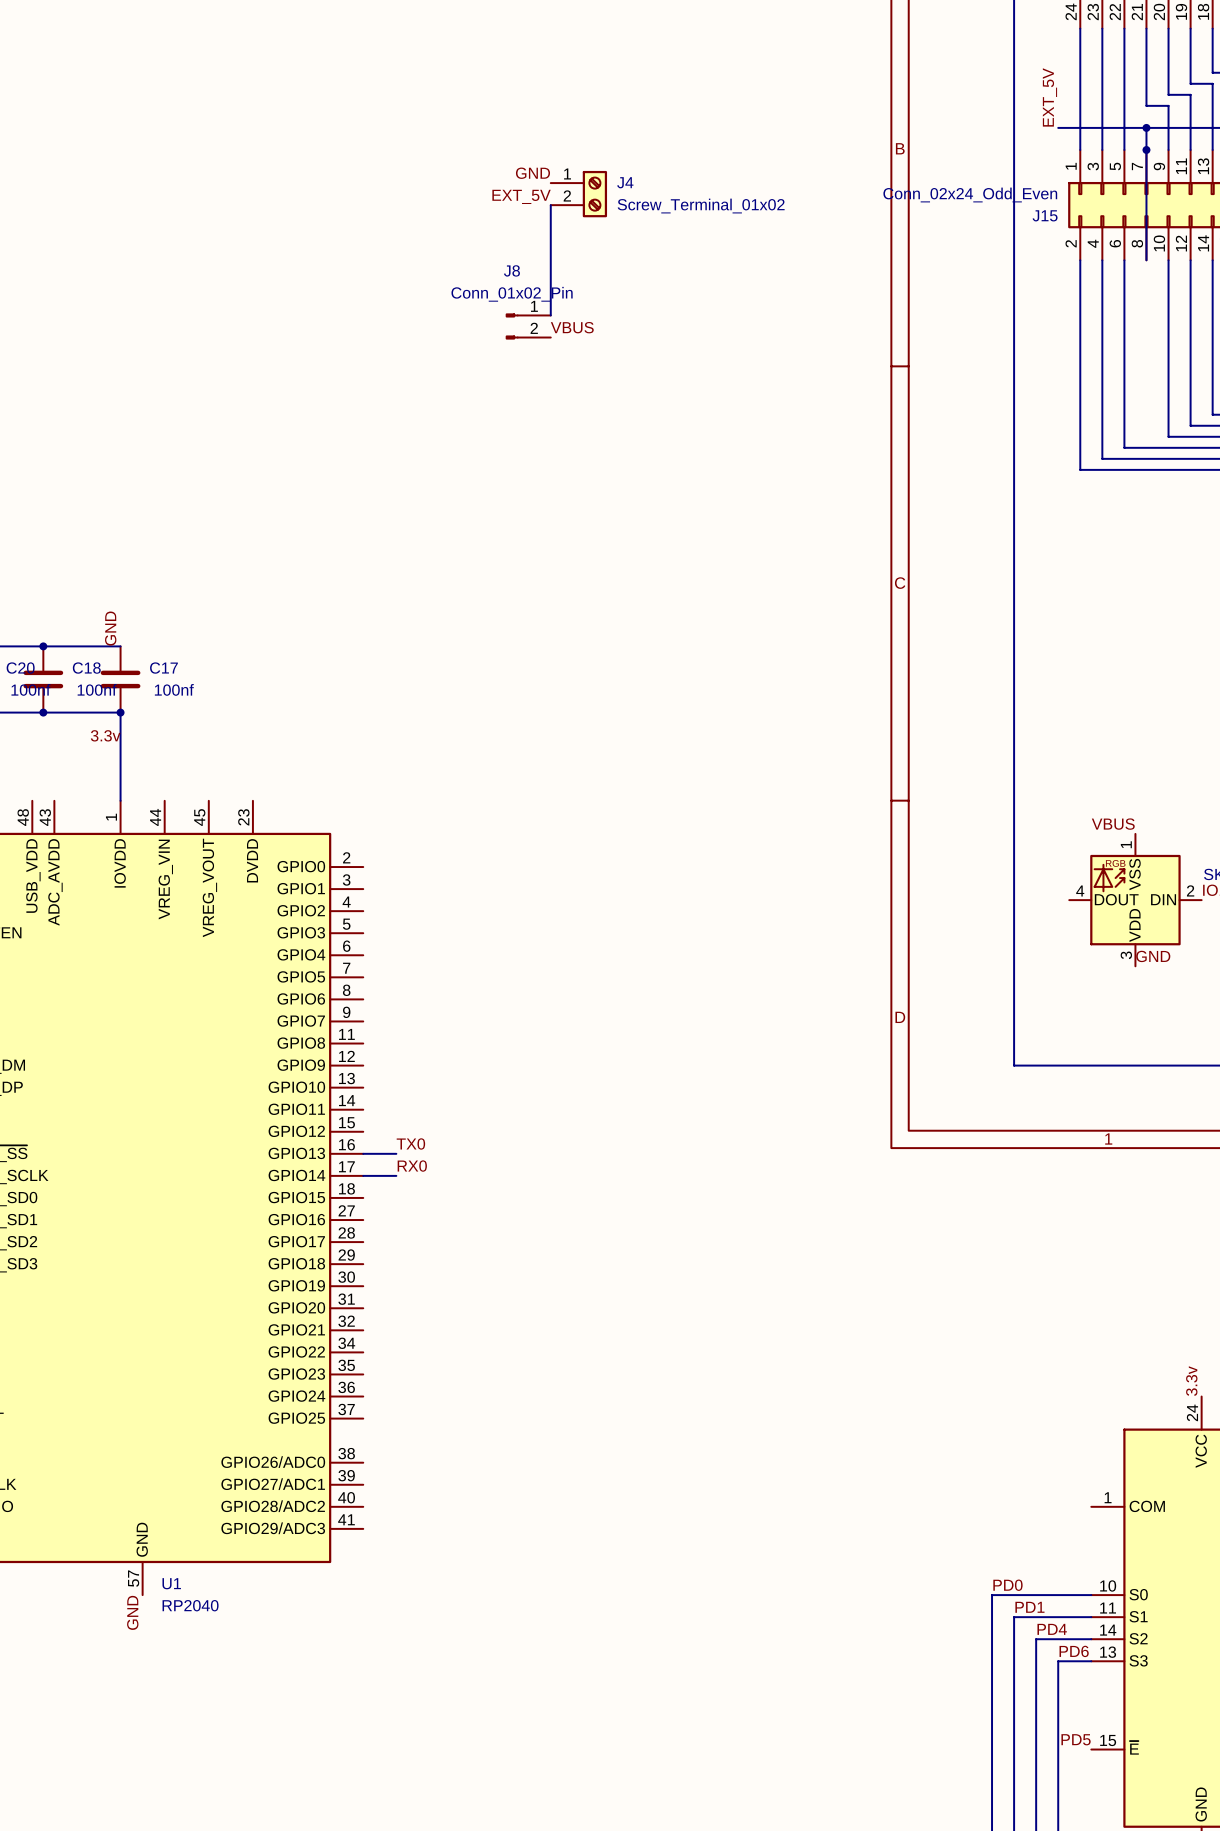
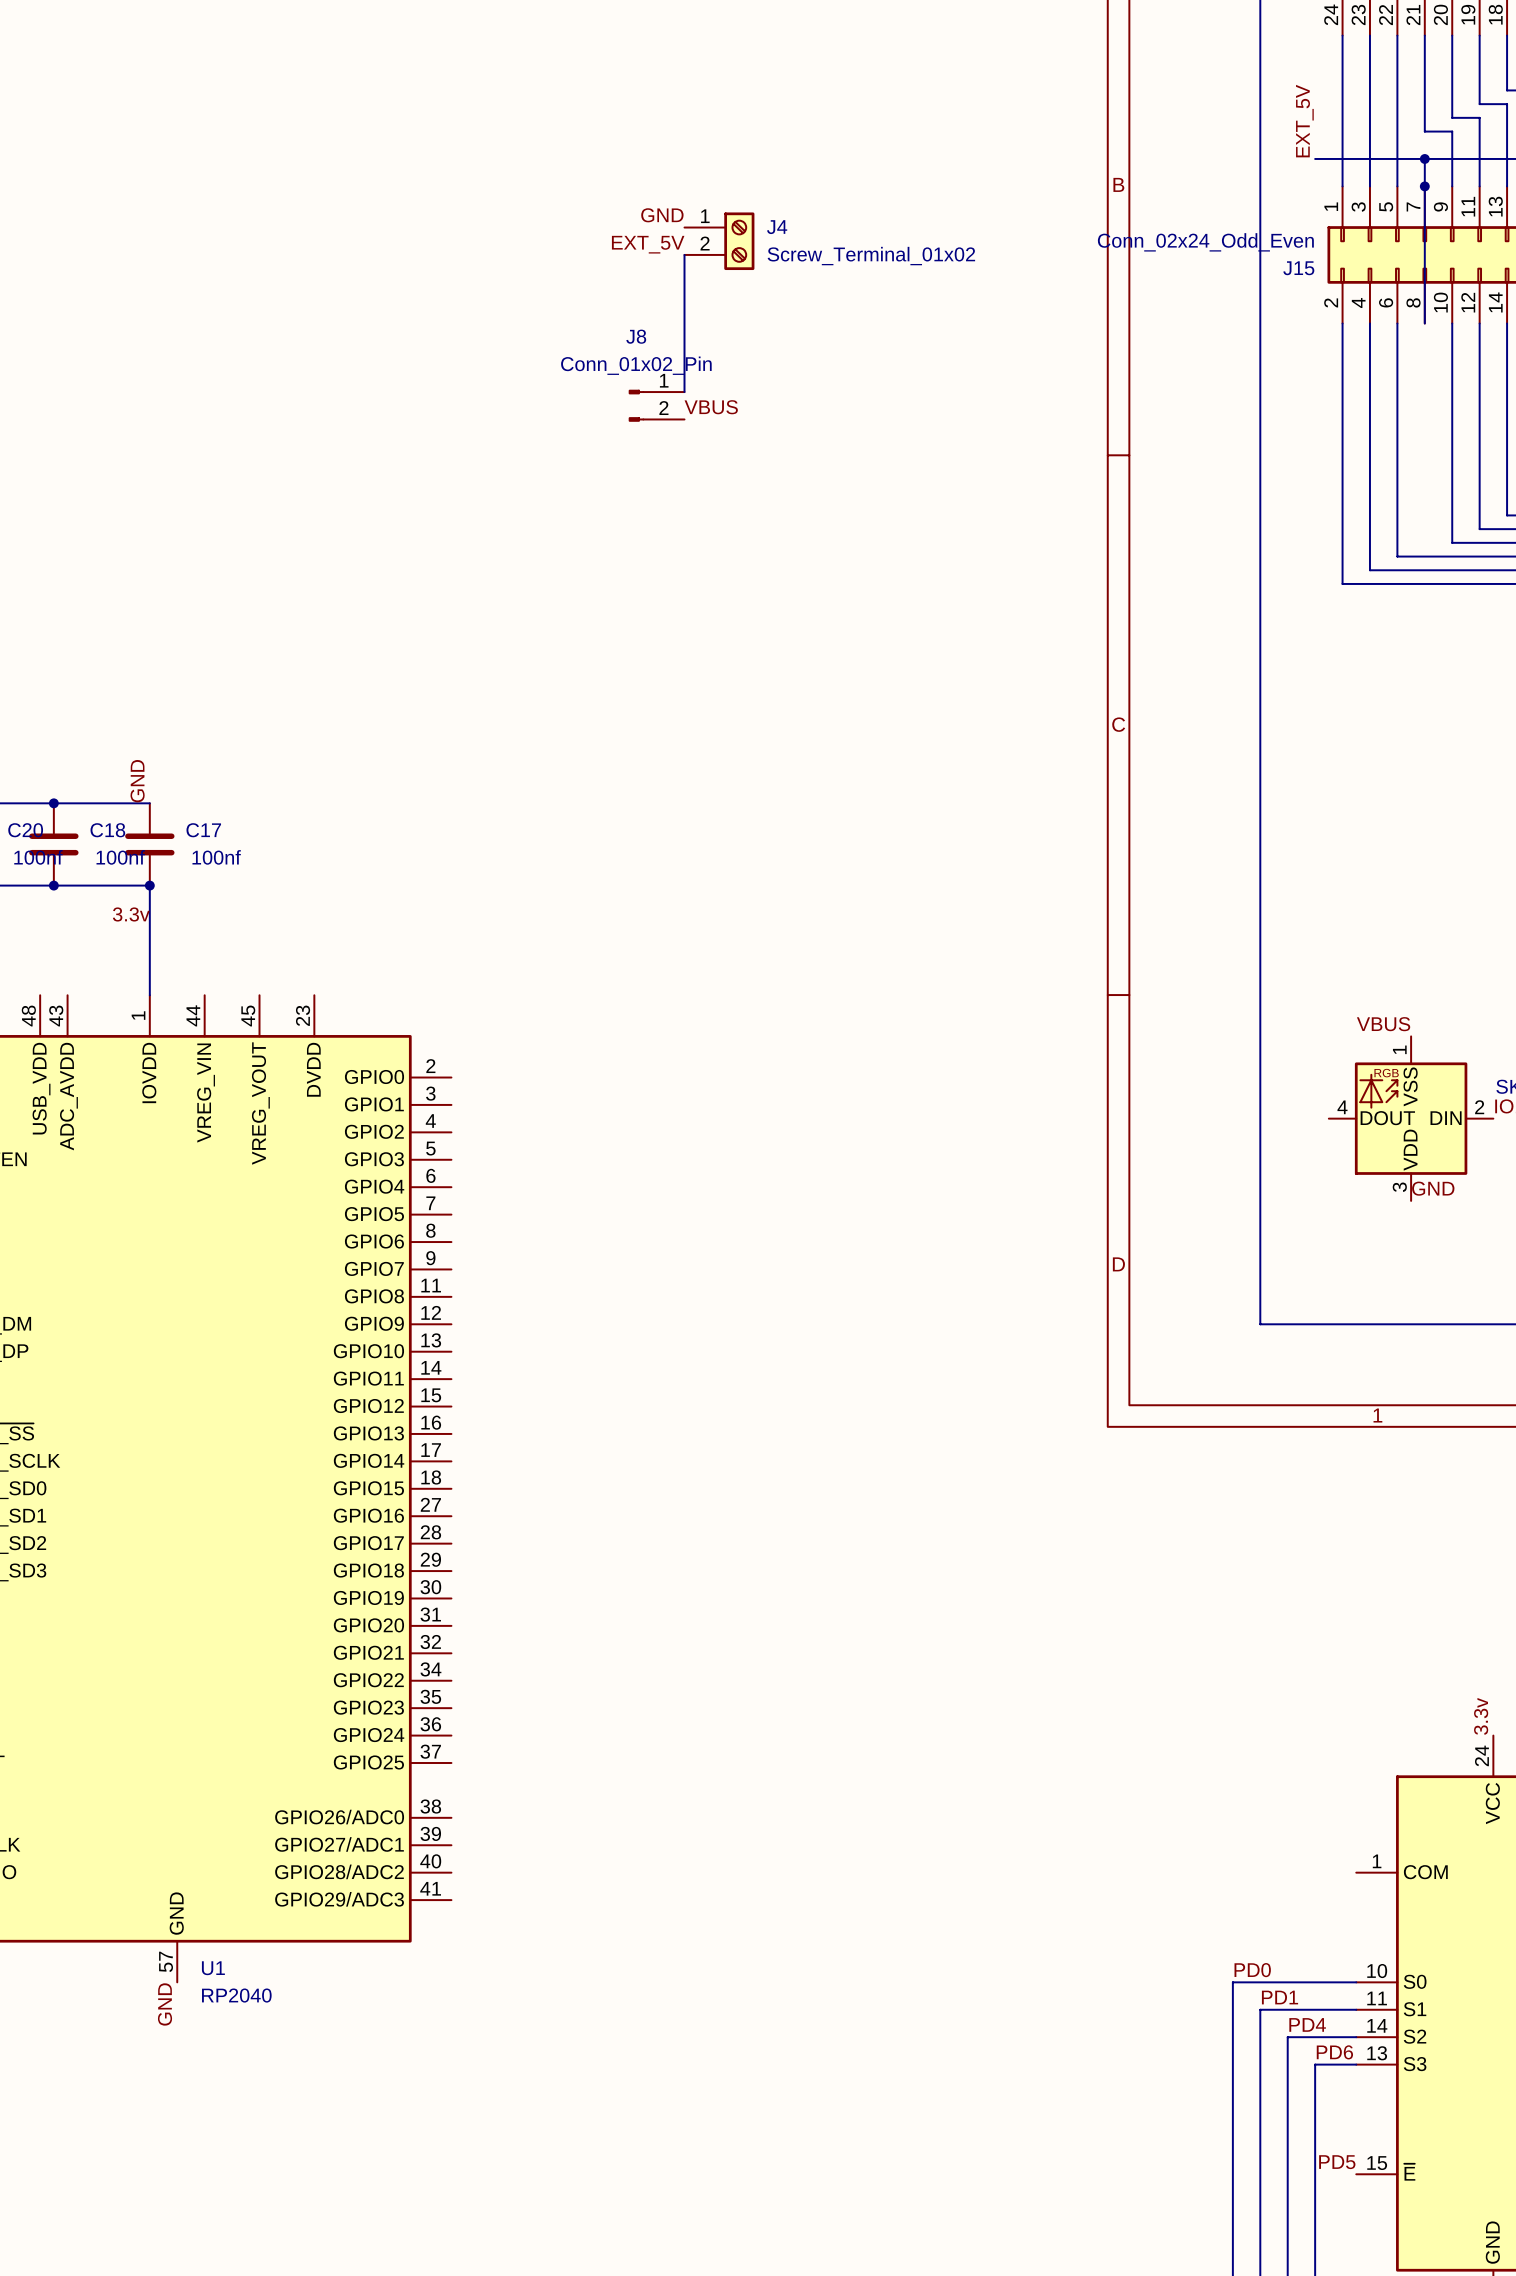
label: TX0 (410, 1143) -> none
wire: (363, 1153) (396, 1153) -> none
label: RX0 (412, 1166) -> none
wire: (363, 1175) (396, 1175) -> none

